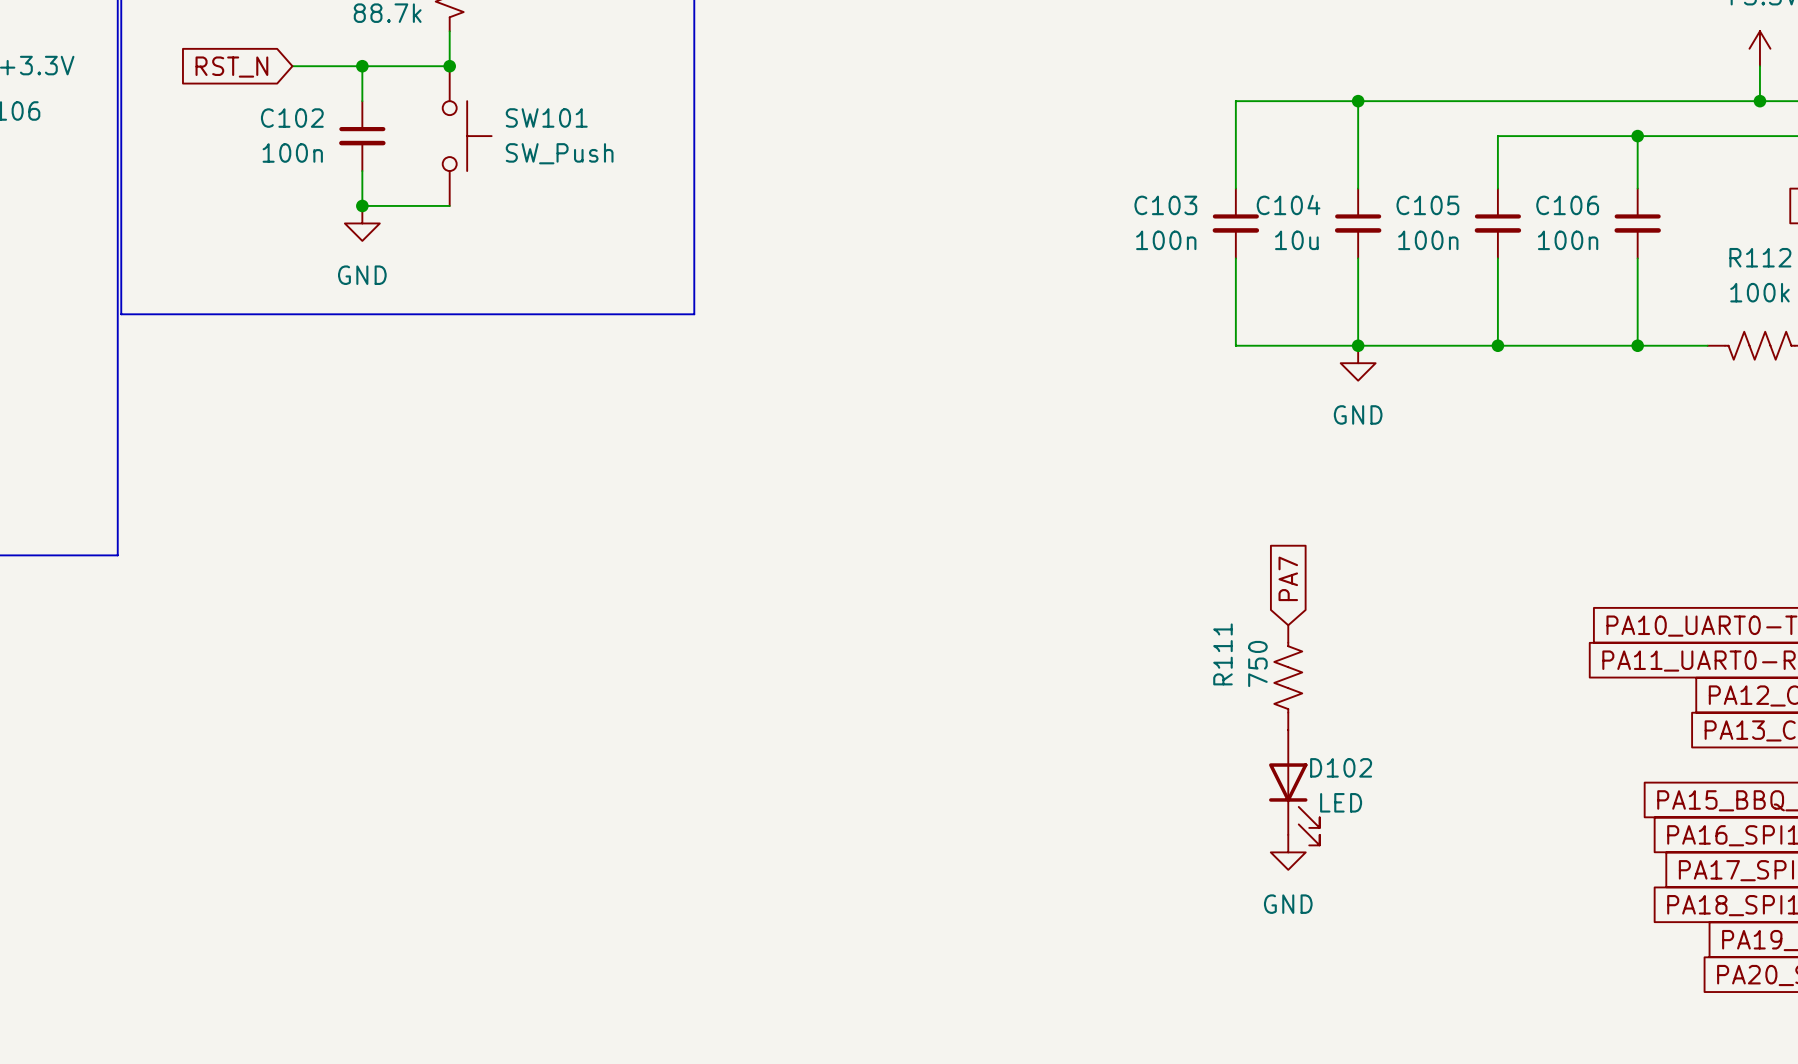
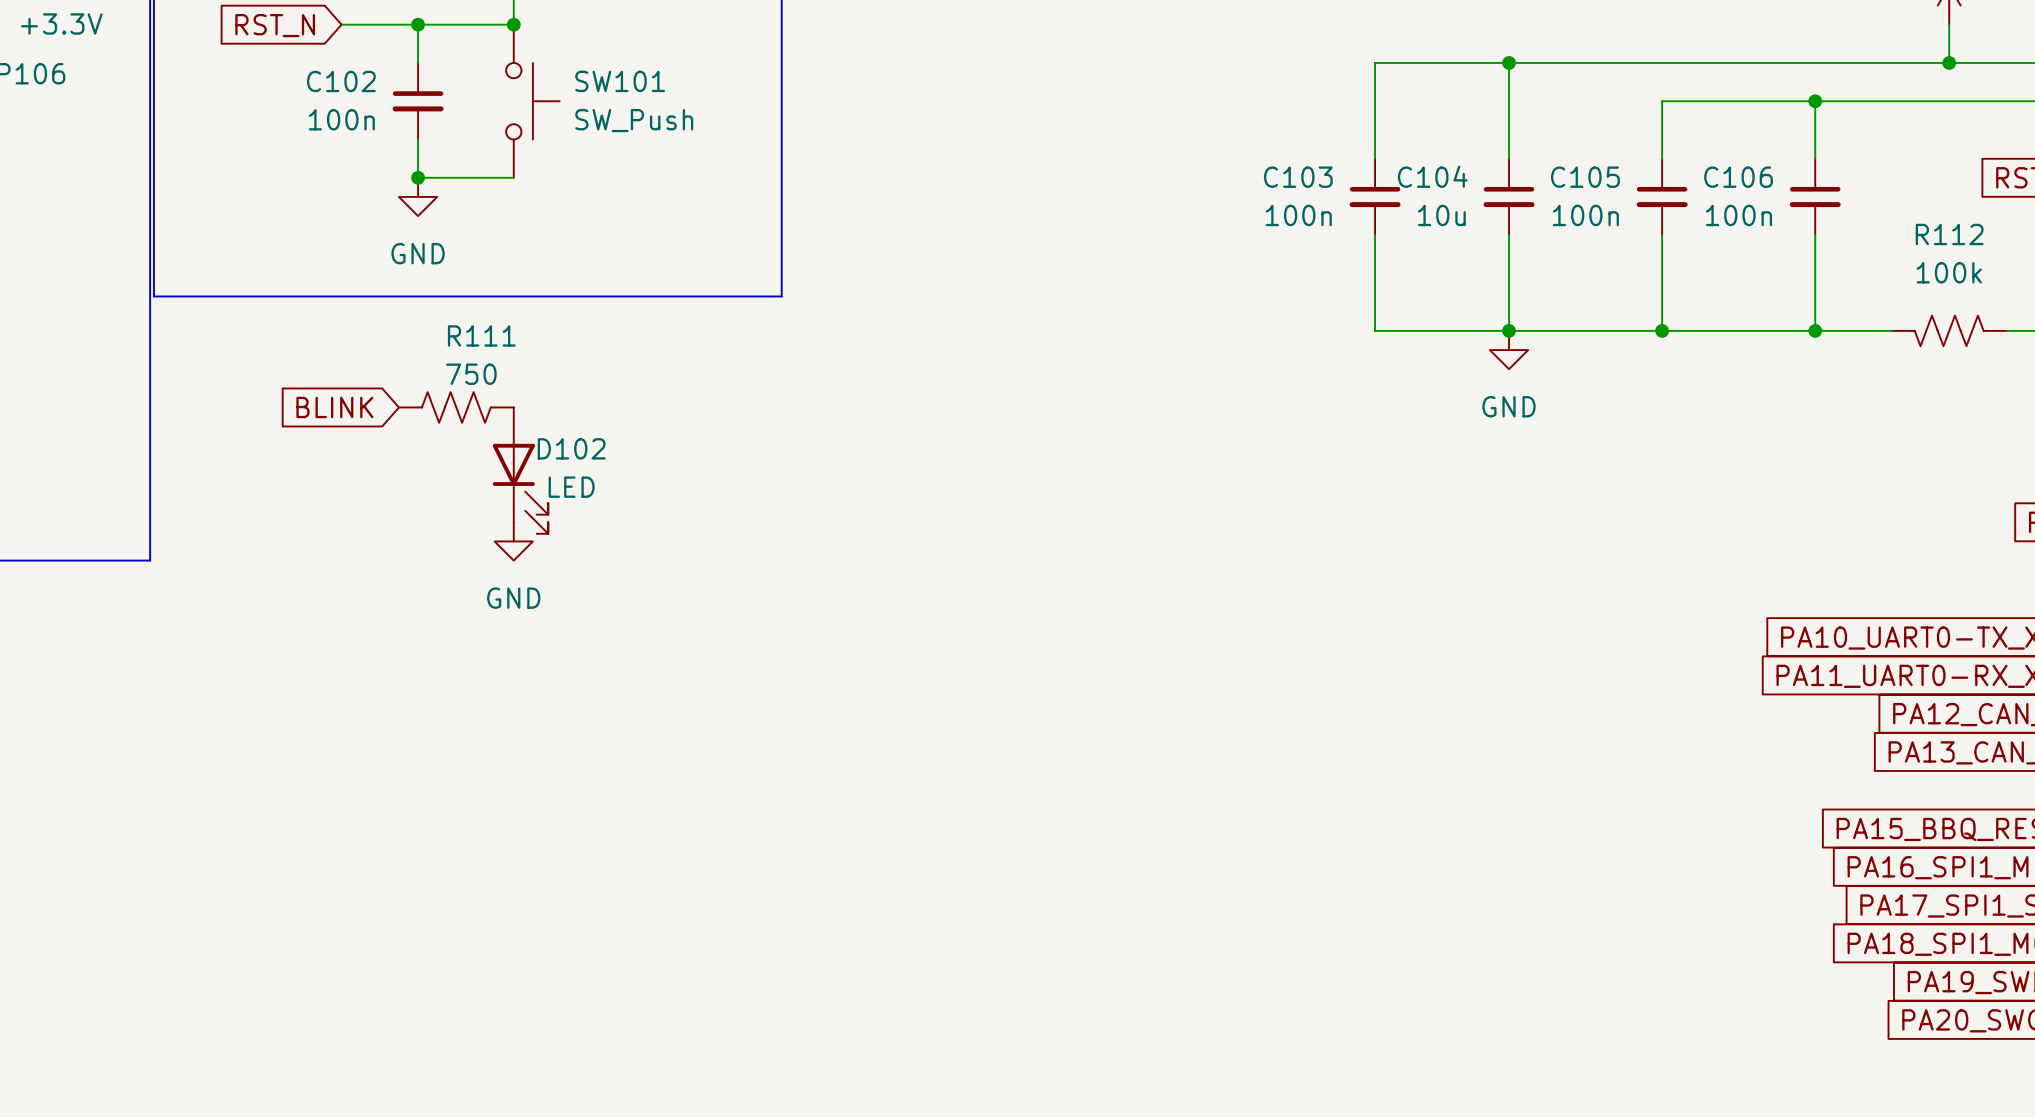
global label: none -> BLINK (334, 407)
power symbol: none -> GND (513, 541)
global label: PA7 (1288, 578) -> none
R111 rotation: 0° (1288, 677) -> 90° clockwise (456, 407)
R111 position: (1288, 677) -> (456, 407)
D102 position: (1294, 787) -> (520, 470)
power symbol: GND (1288, 852) -> none

